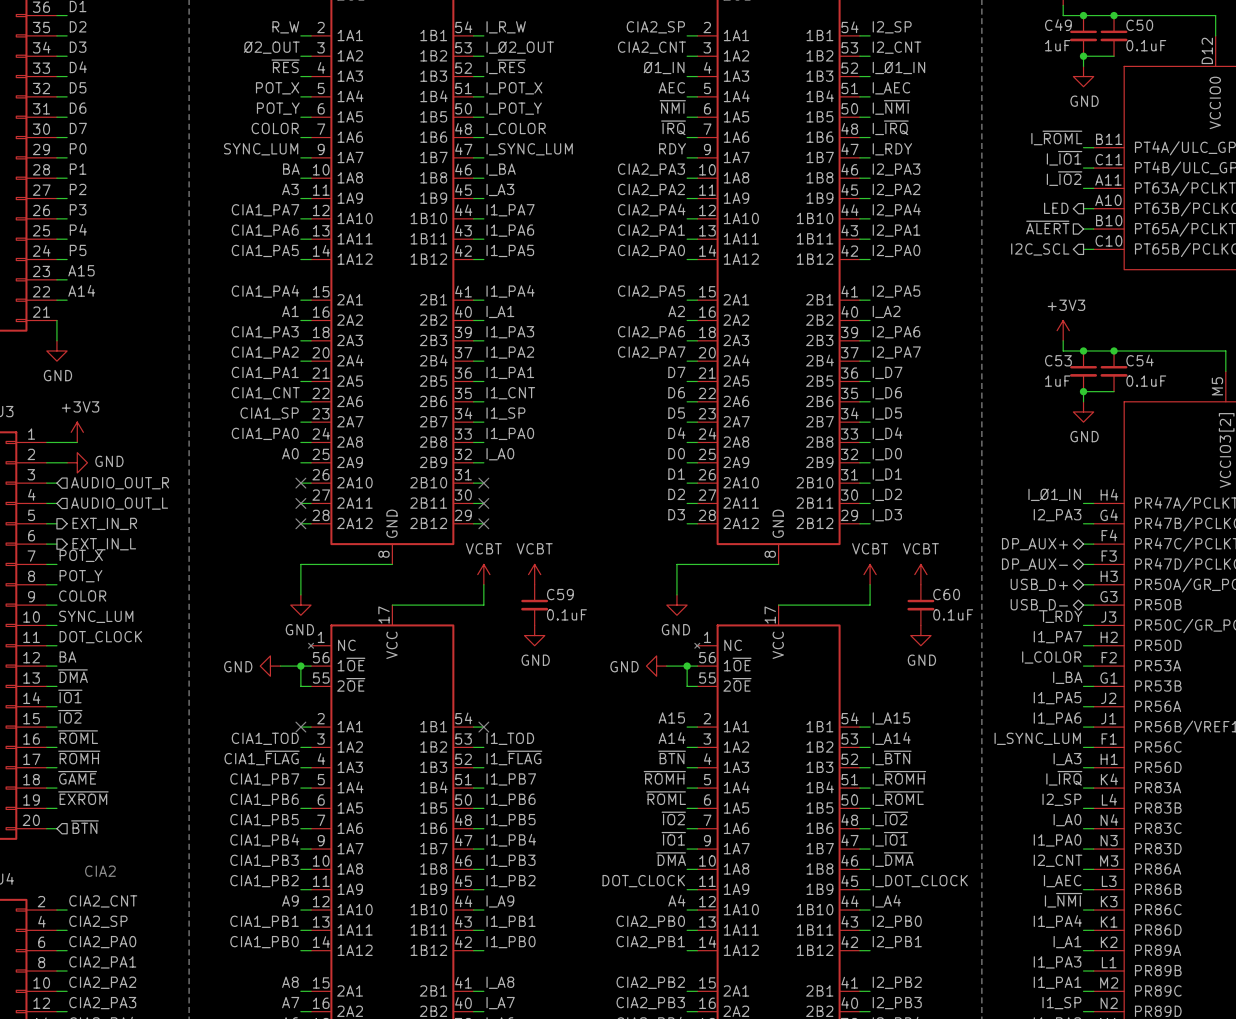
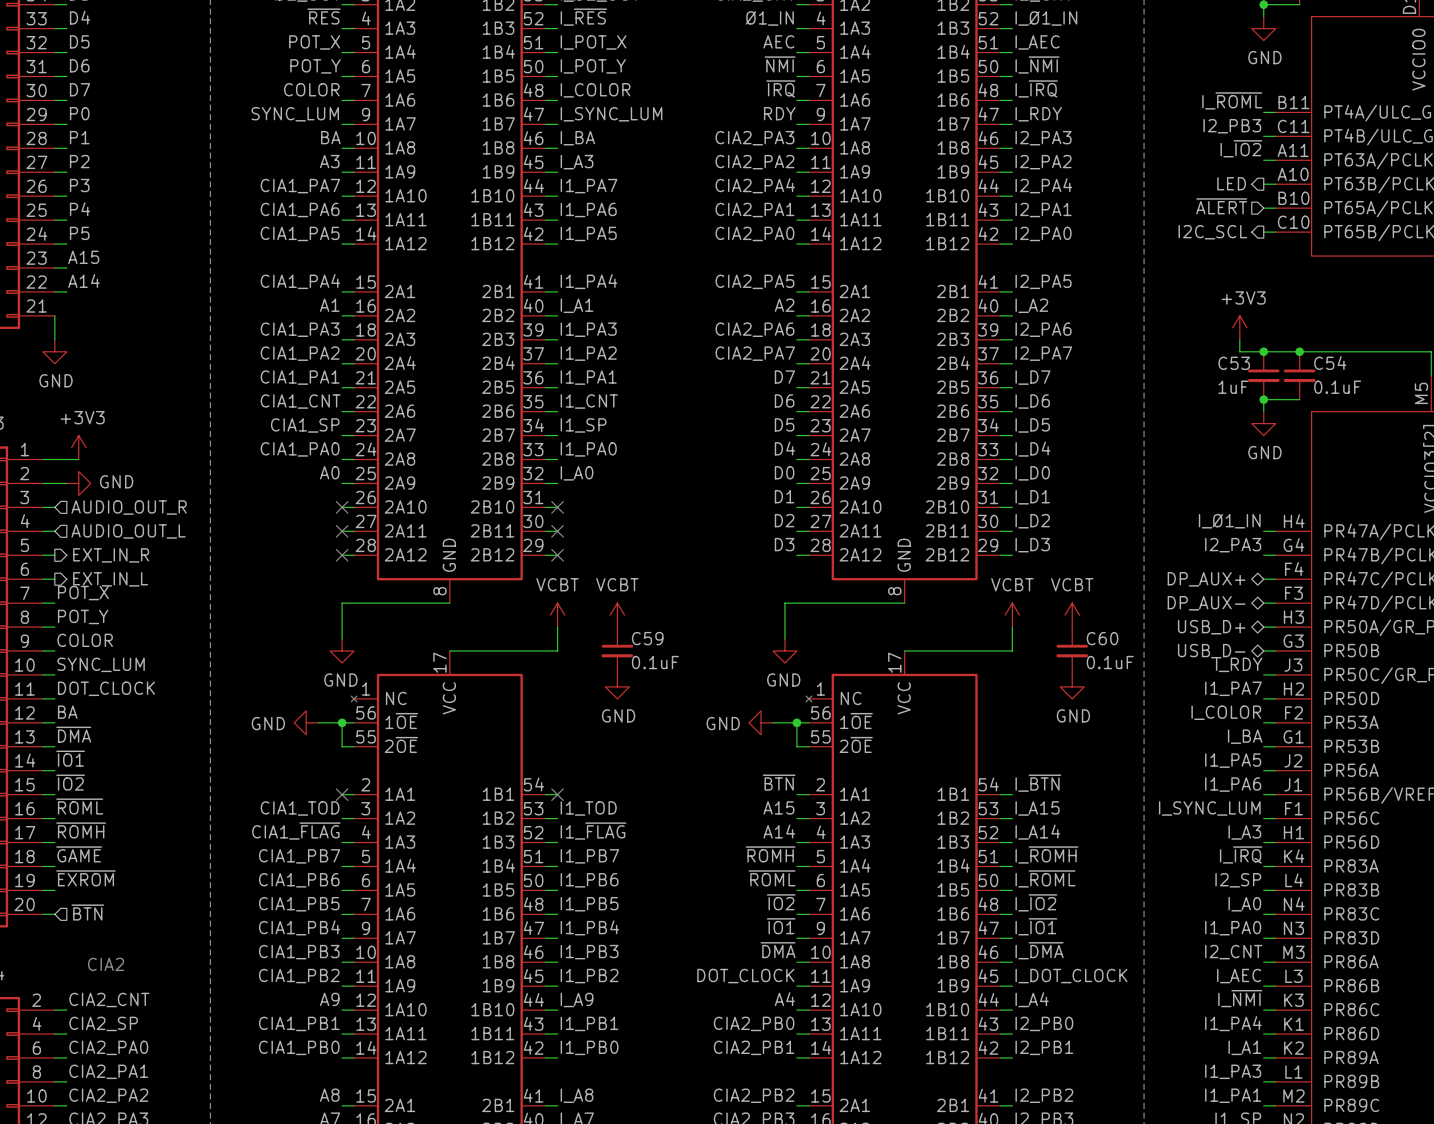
label: I_~{IO1} (1064, 158) -> I2_PB3 (1232, 126)
label: A15 (671, 717) -> ~{BTN} (779, 782)
label: I_A15 (891, 718) -> I_~{BTN} (1038, 783)
label: A14 (672, 738) -> A15 (778, 807)
label: I_A14 (891, 738) -> I_A15 (1037, 808)
label: ~{BTN} (672, 757) -> A14 (779, 831)
label: I_~{BTN} (892, 757) -> I_A14 (1037, 832)

